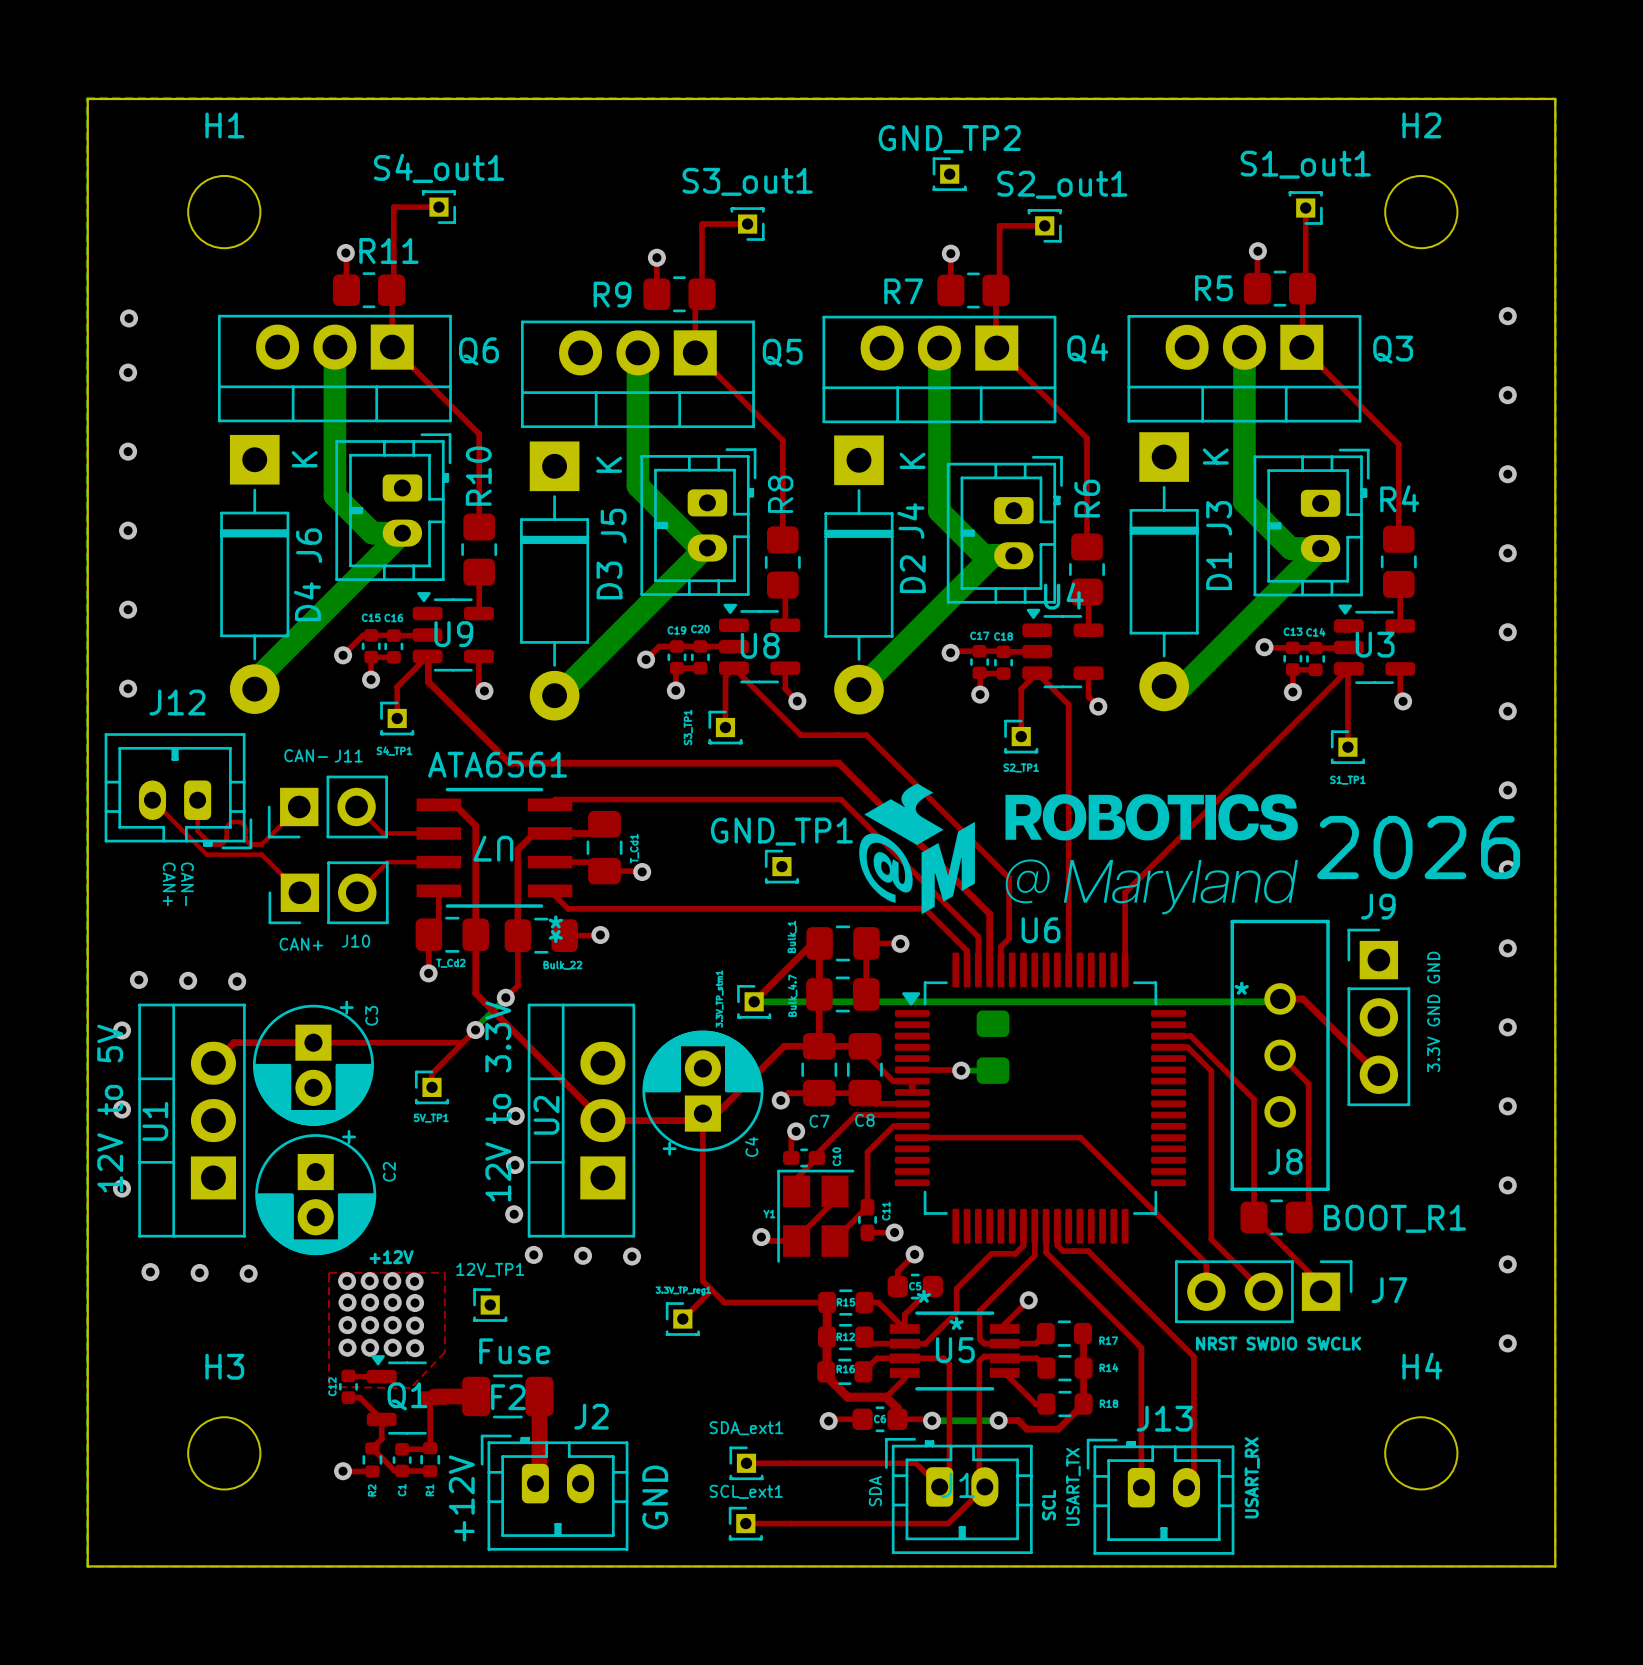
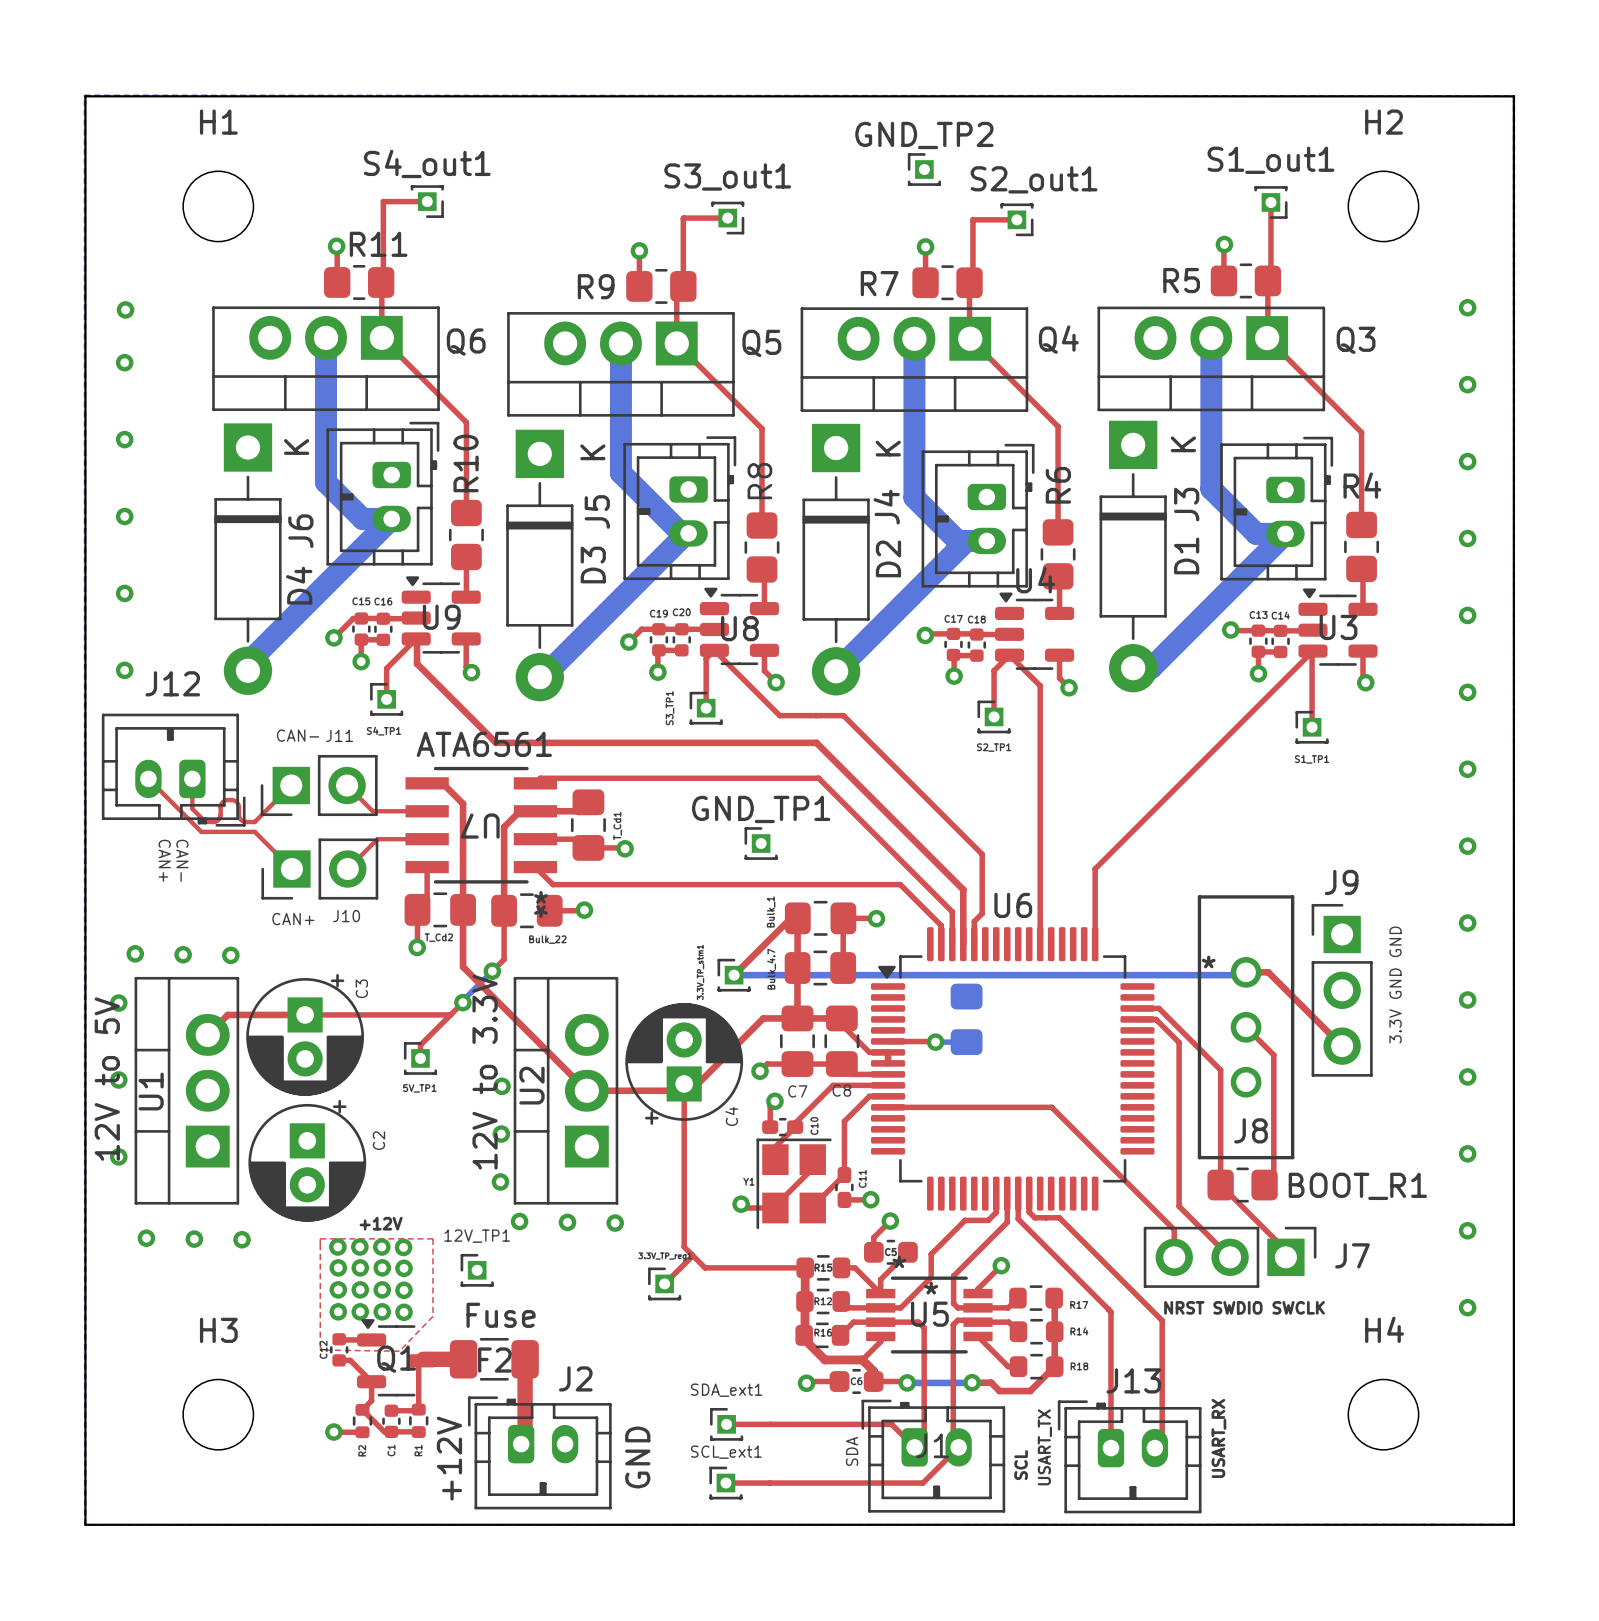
drawing: [859, 783, 1298, 915] -> none
text: 2026 (1418, 847) -> none

